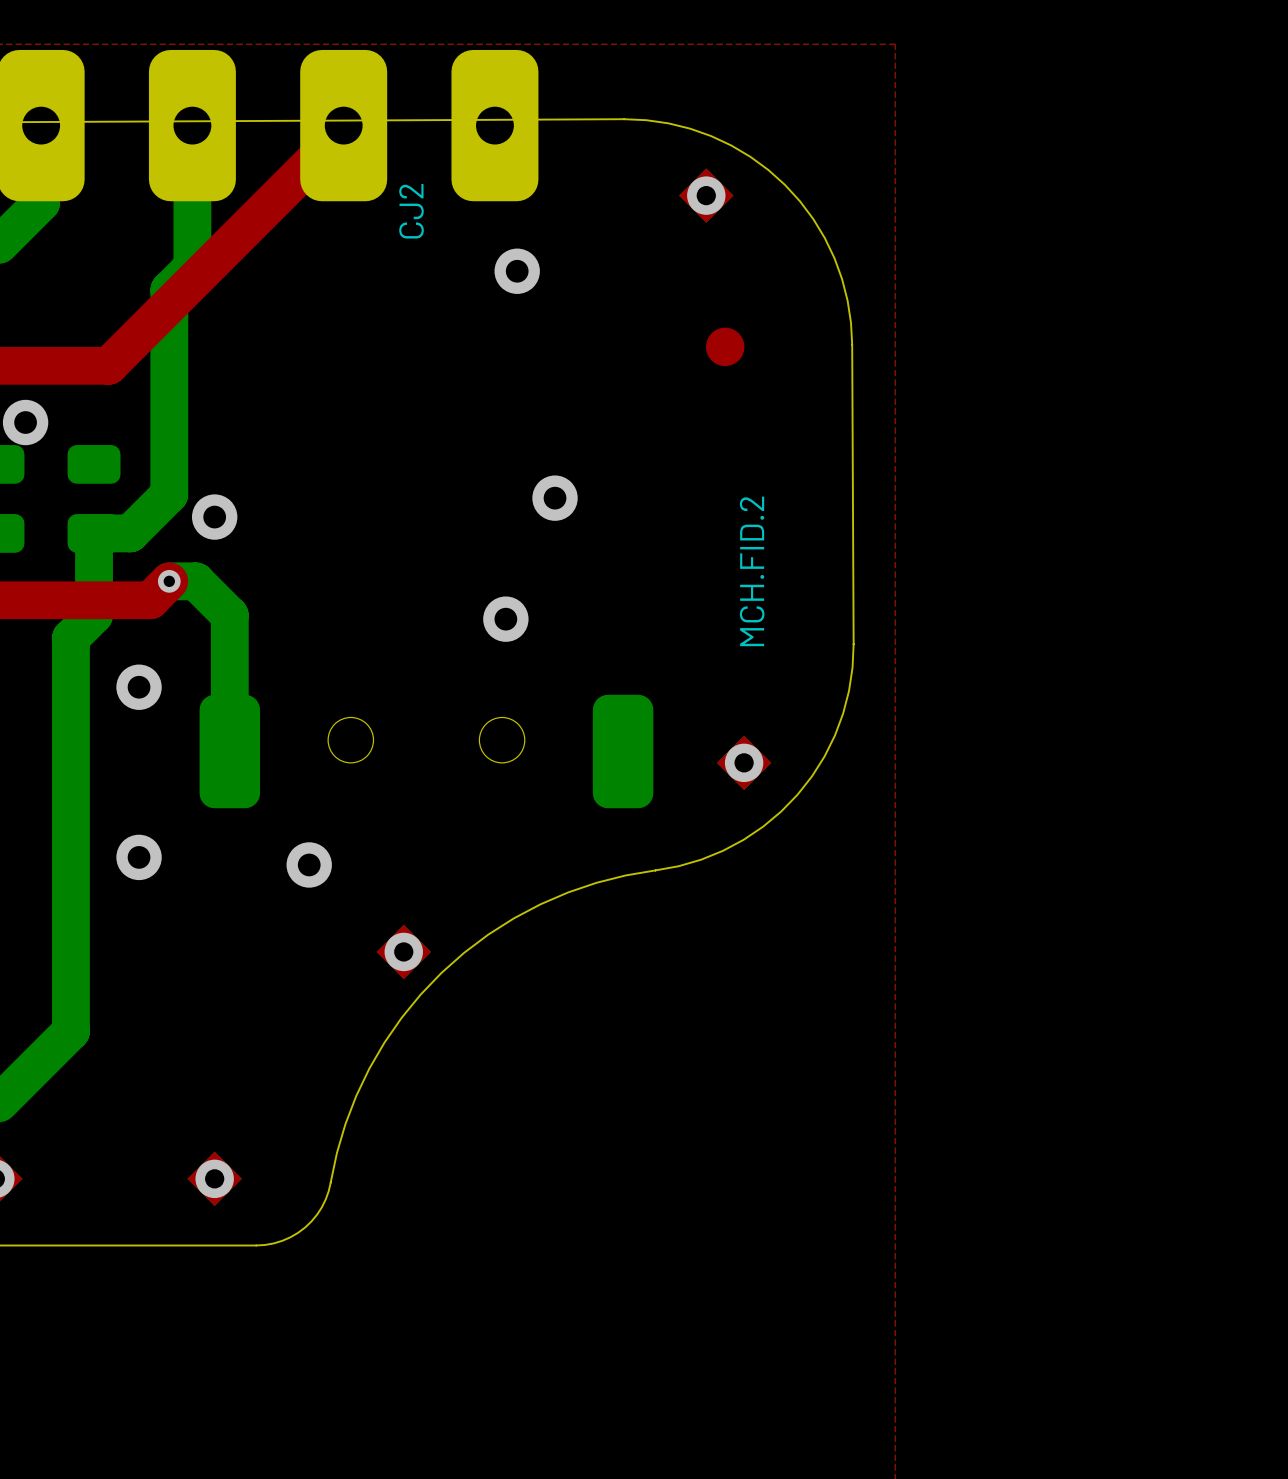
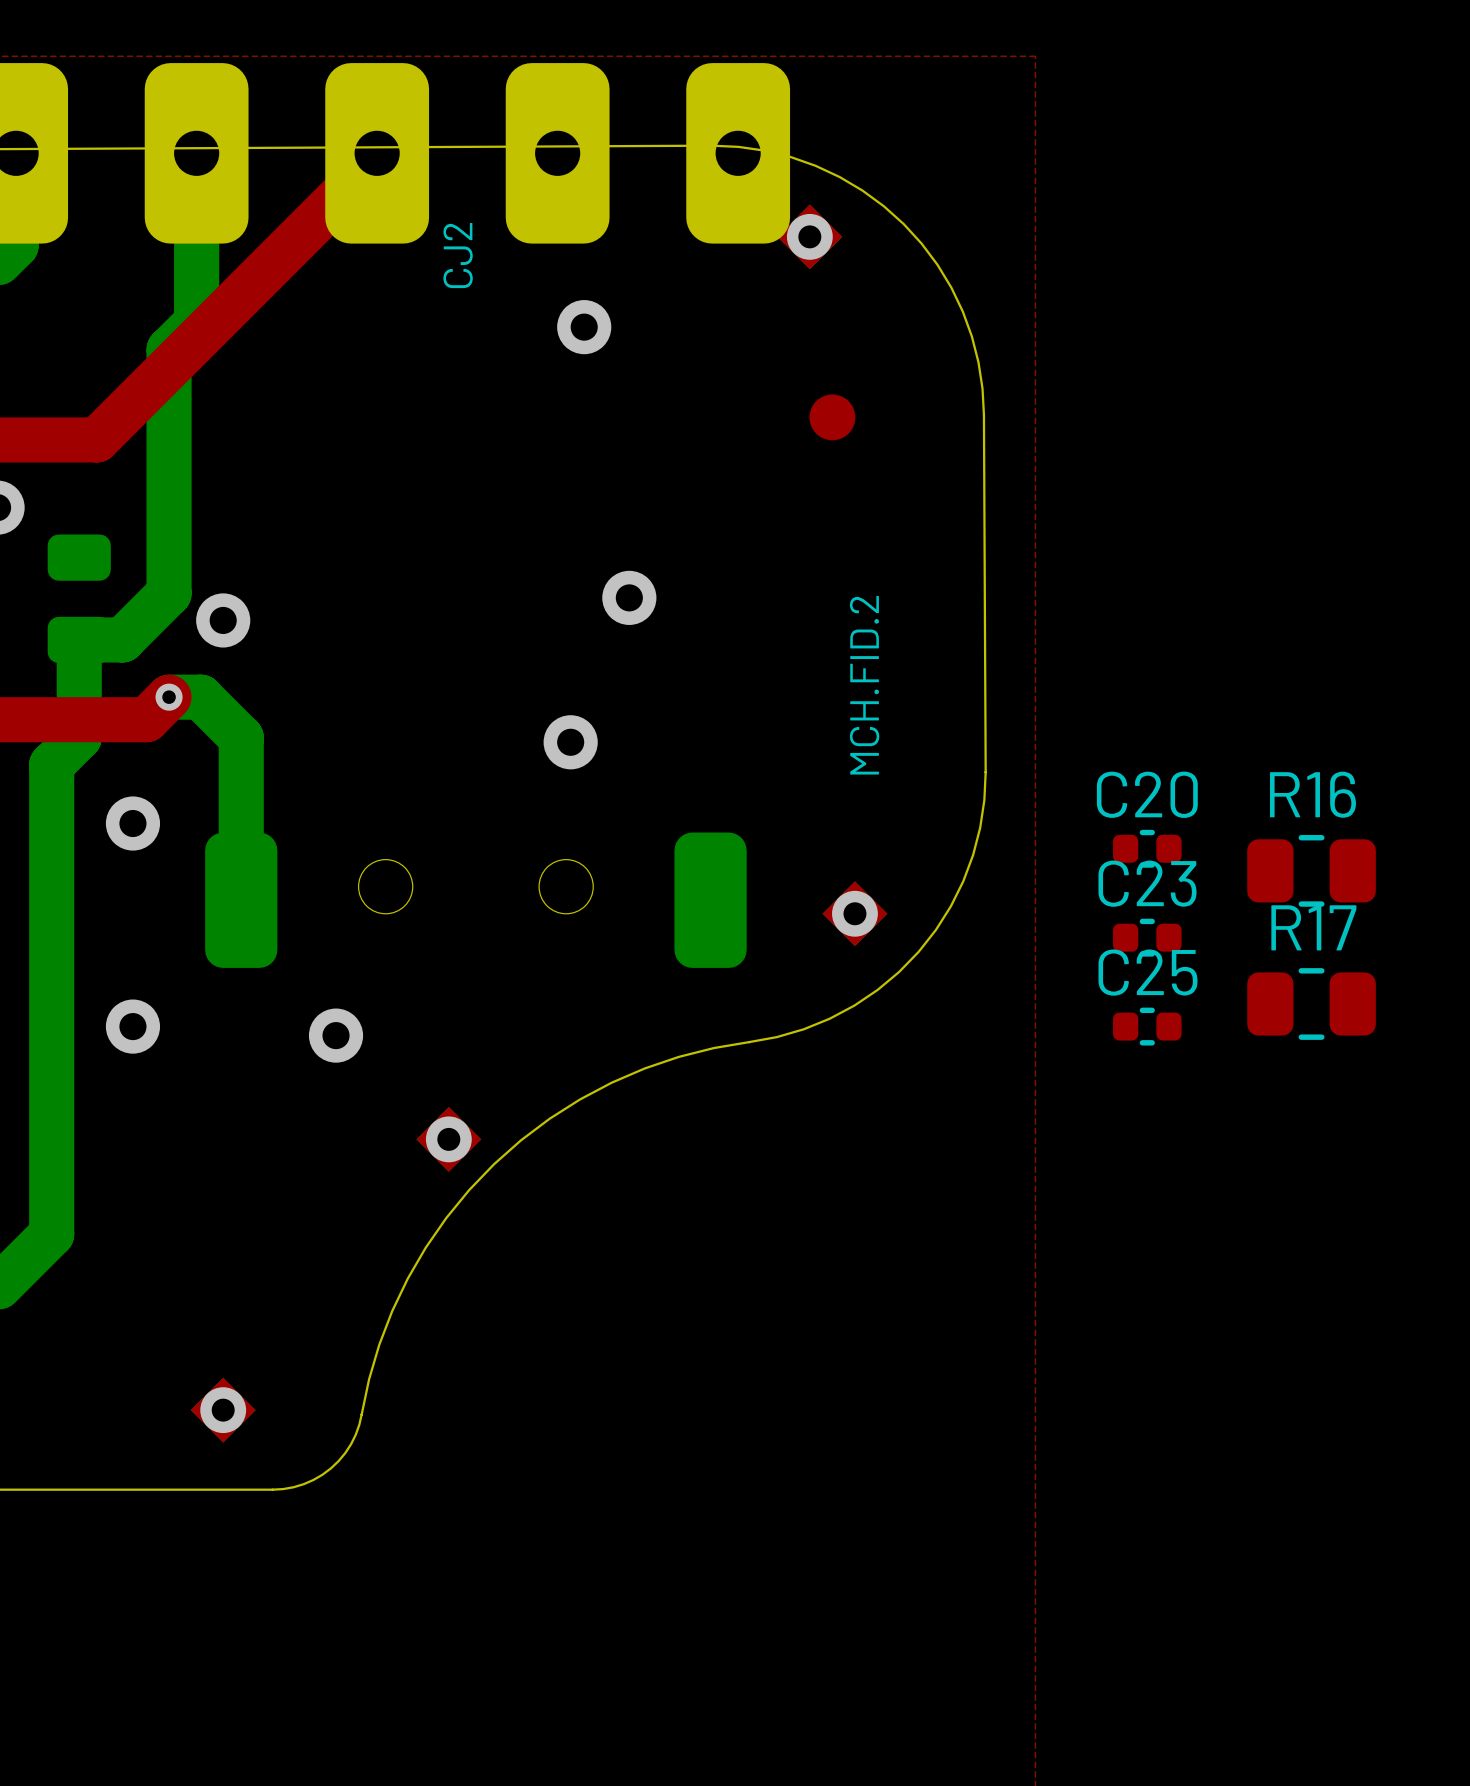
part: none -> (738, 153)
C20: none -> (1147, 848)
R16: none -> (1311, 870)
C23: none -> (1147, 937)
R17: none -> (1311, 1004)
C25: none -> (1147, 1026)

